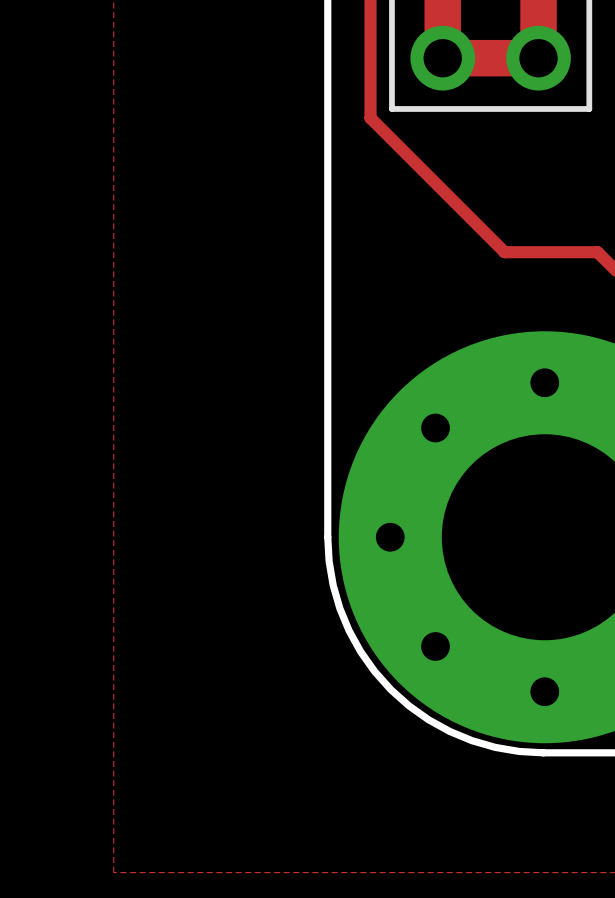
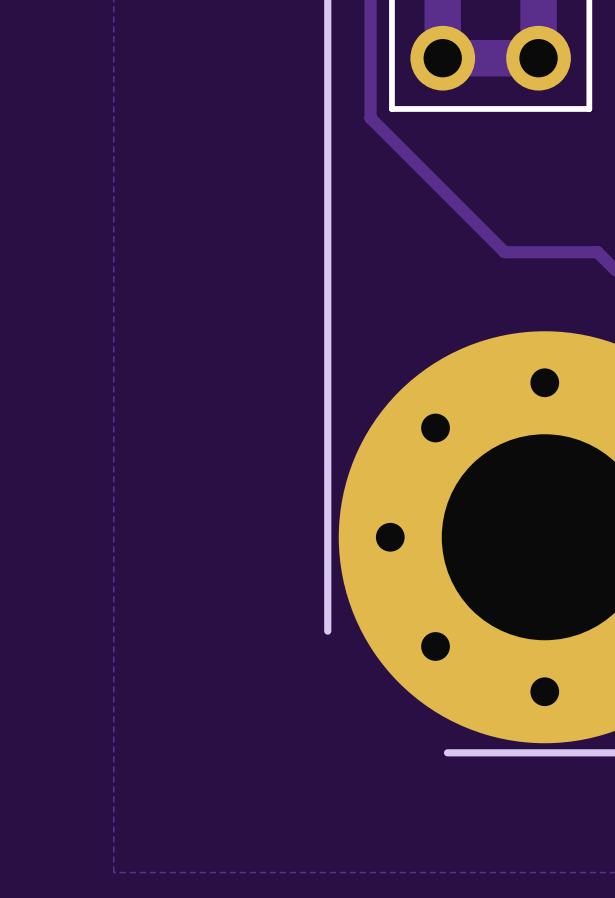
board edge: (327, 537) (333, 585) (349, 630) (374, 671) (390, 689) (408, 705) (449, 731) (495, 747) (543, 752) -> (447, 752) (543, 752)
board edge: none -> (327, 537) (327, 631)

